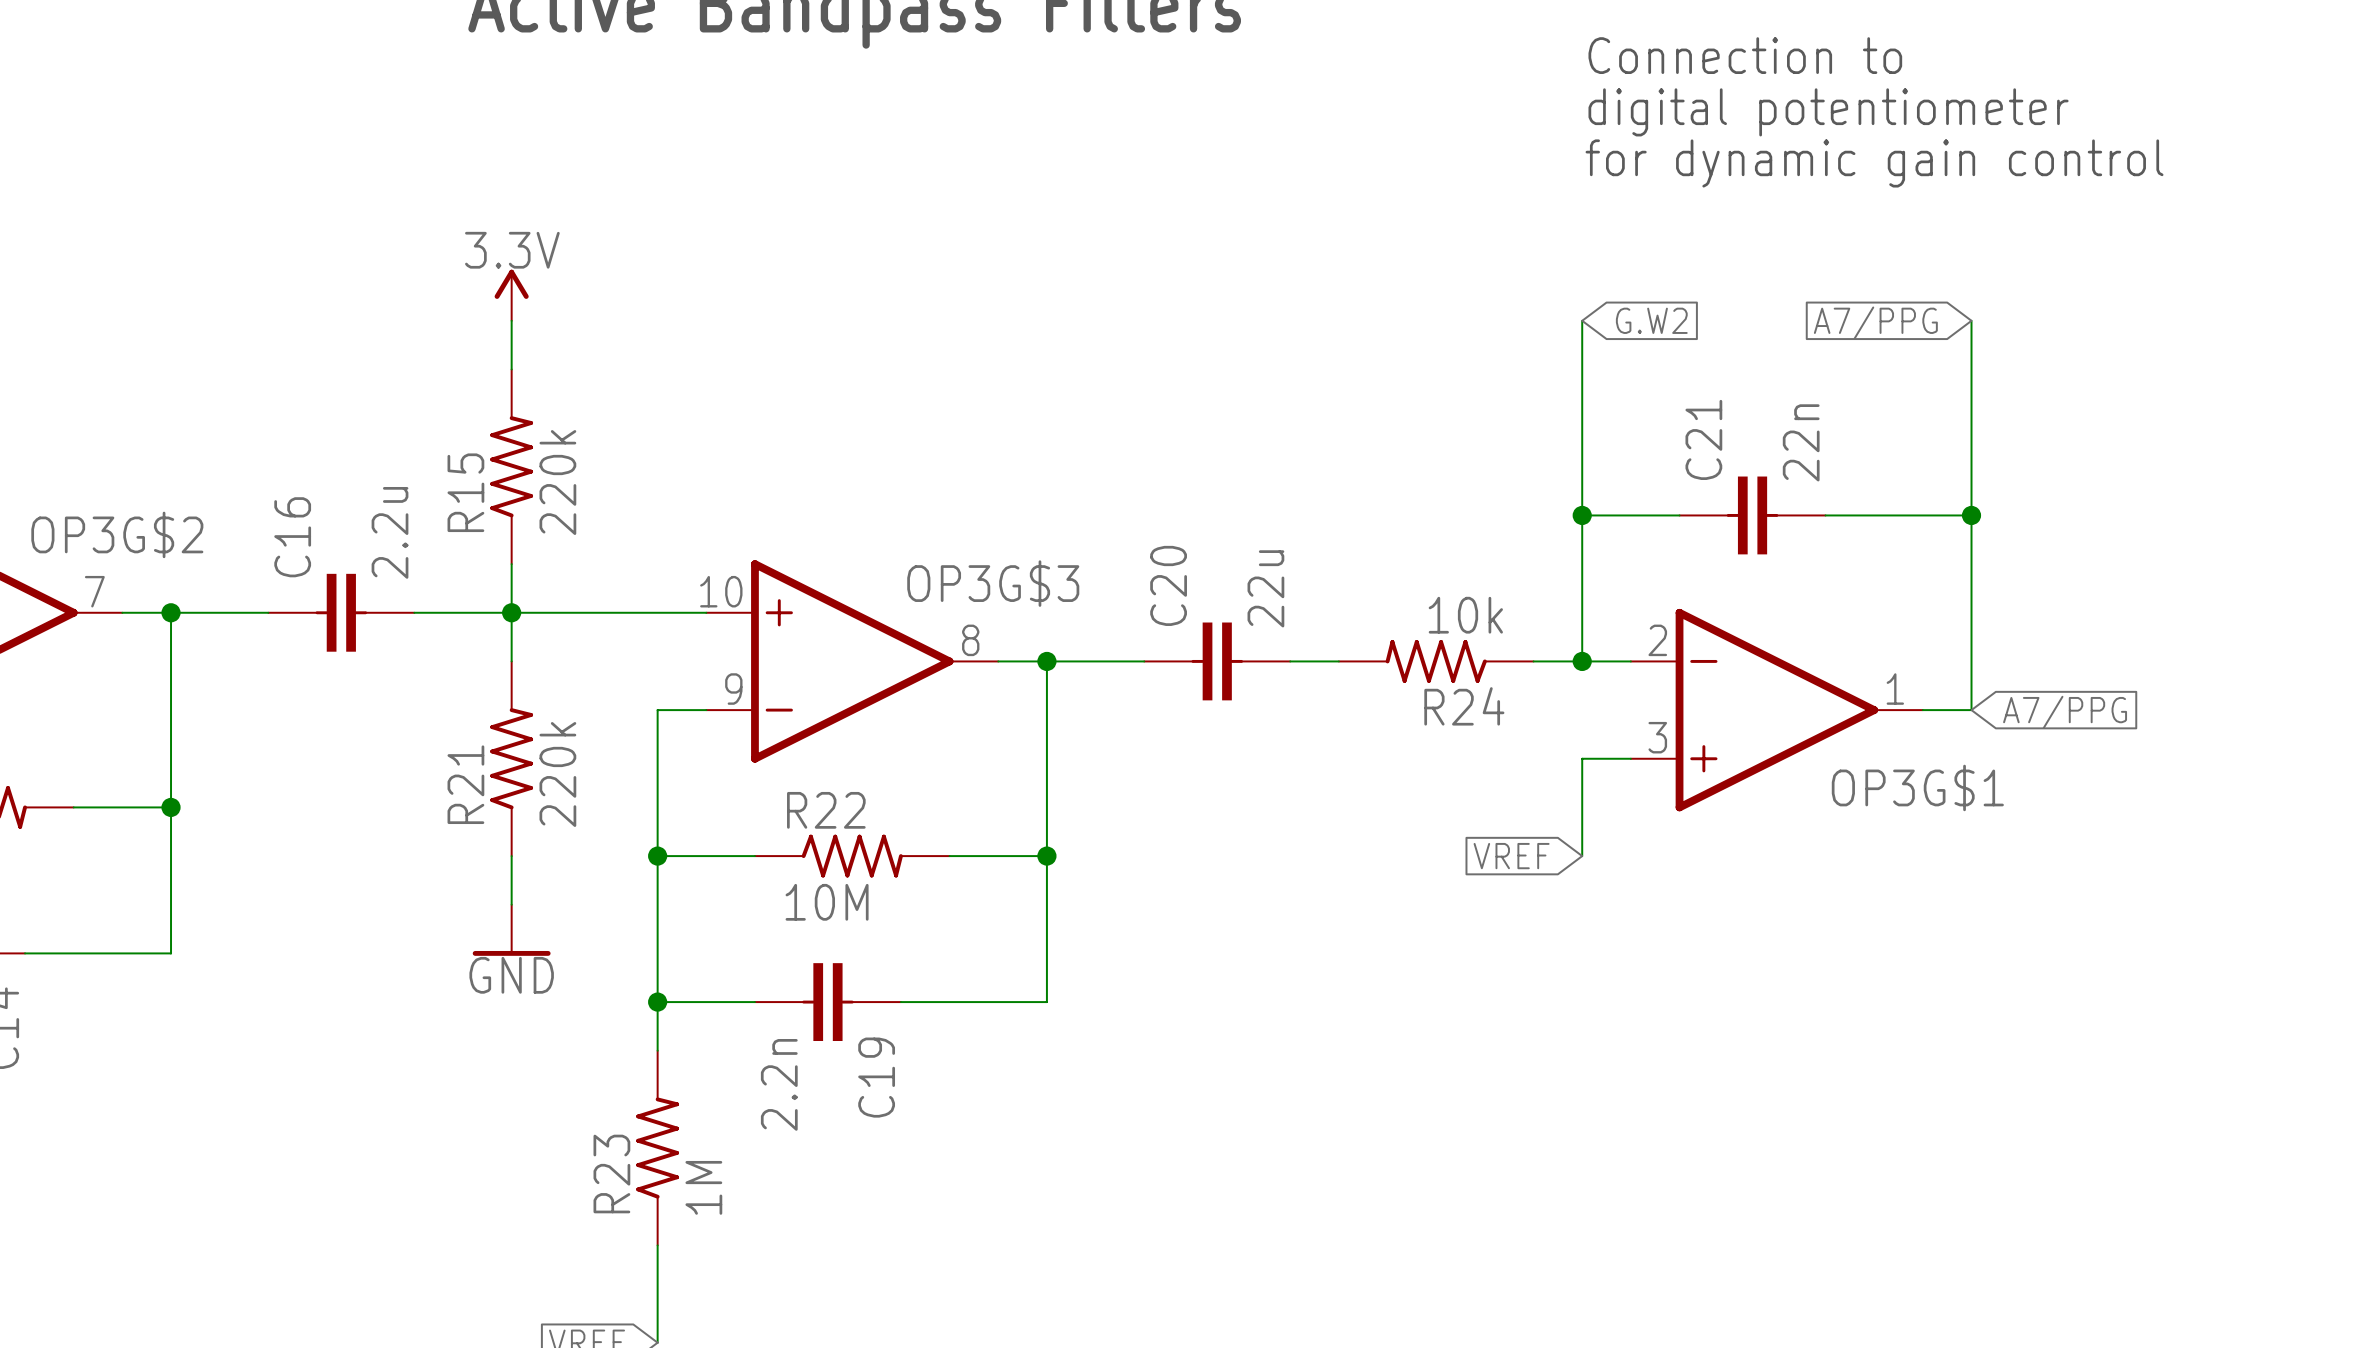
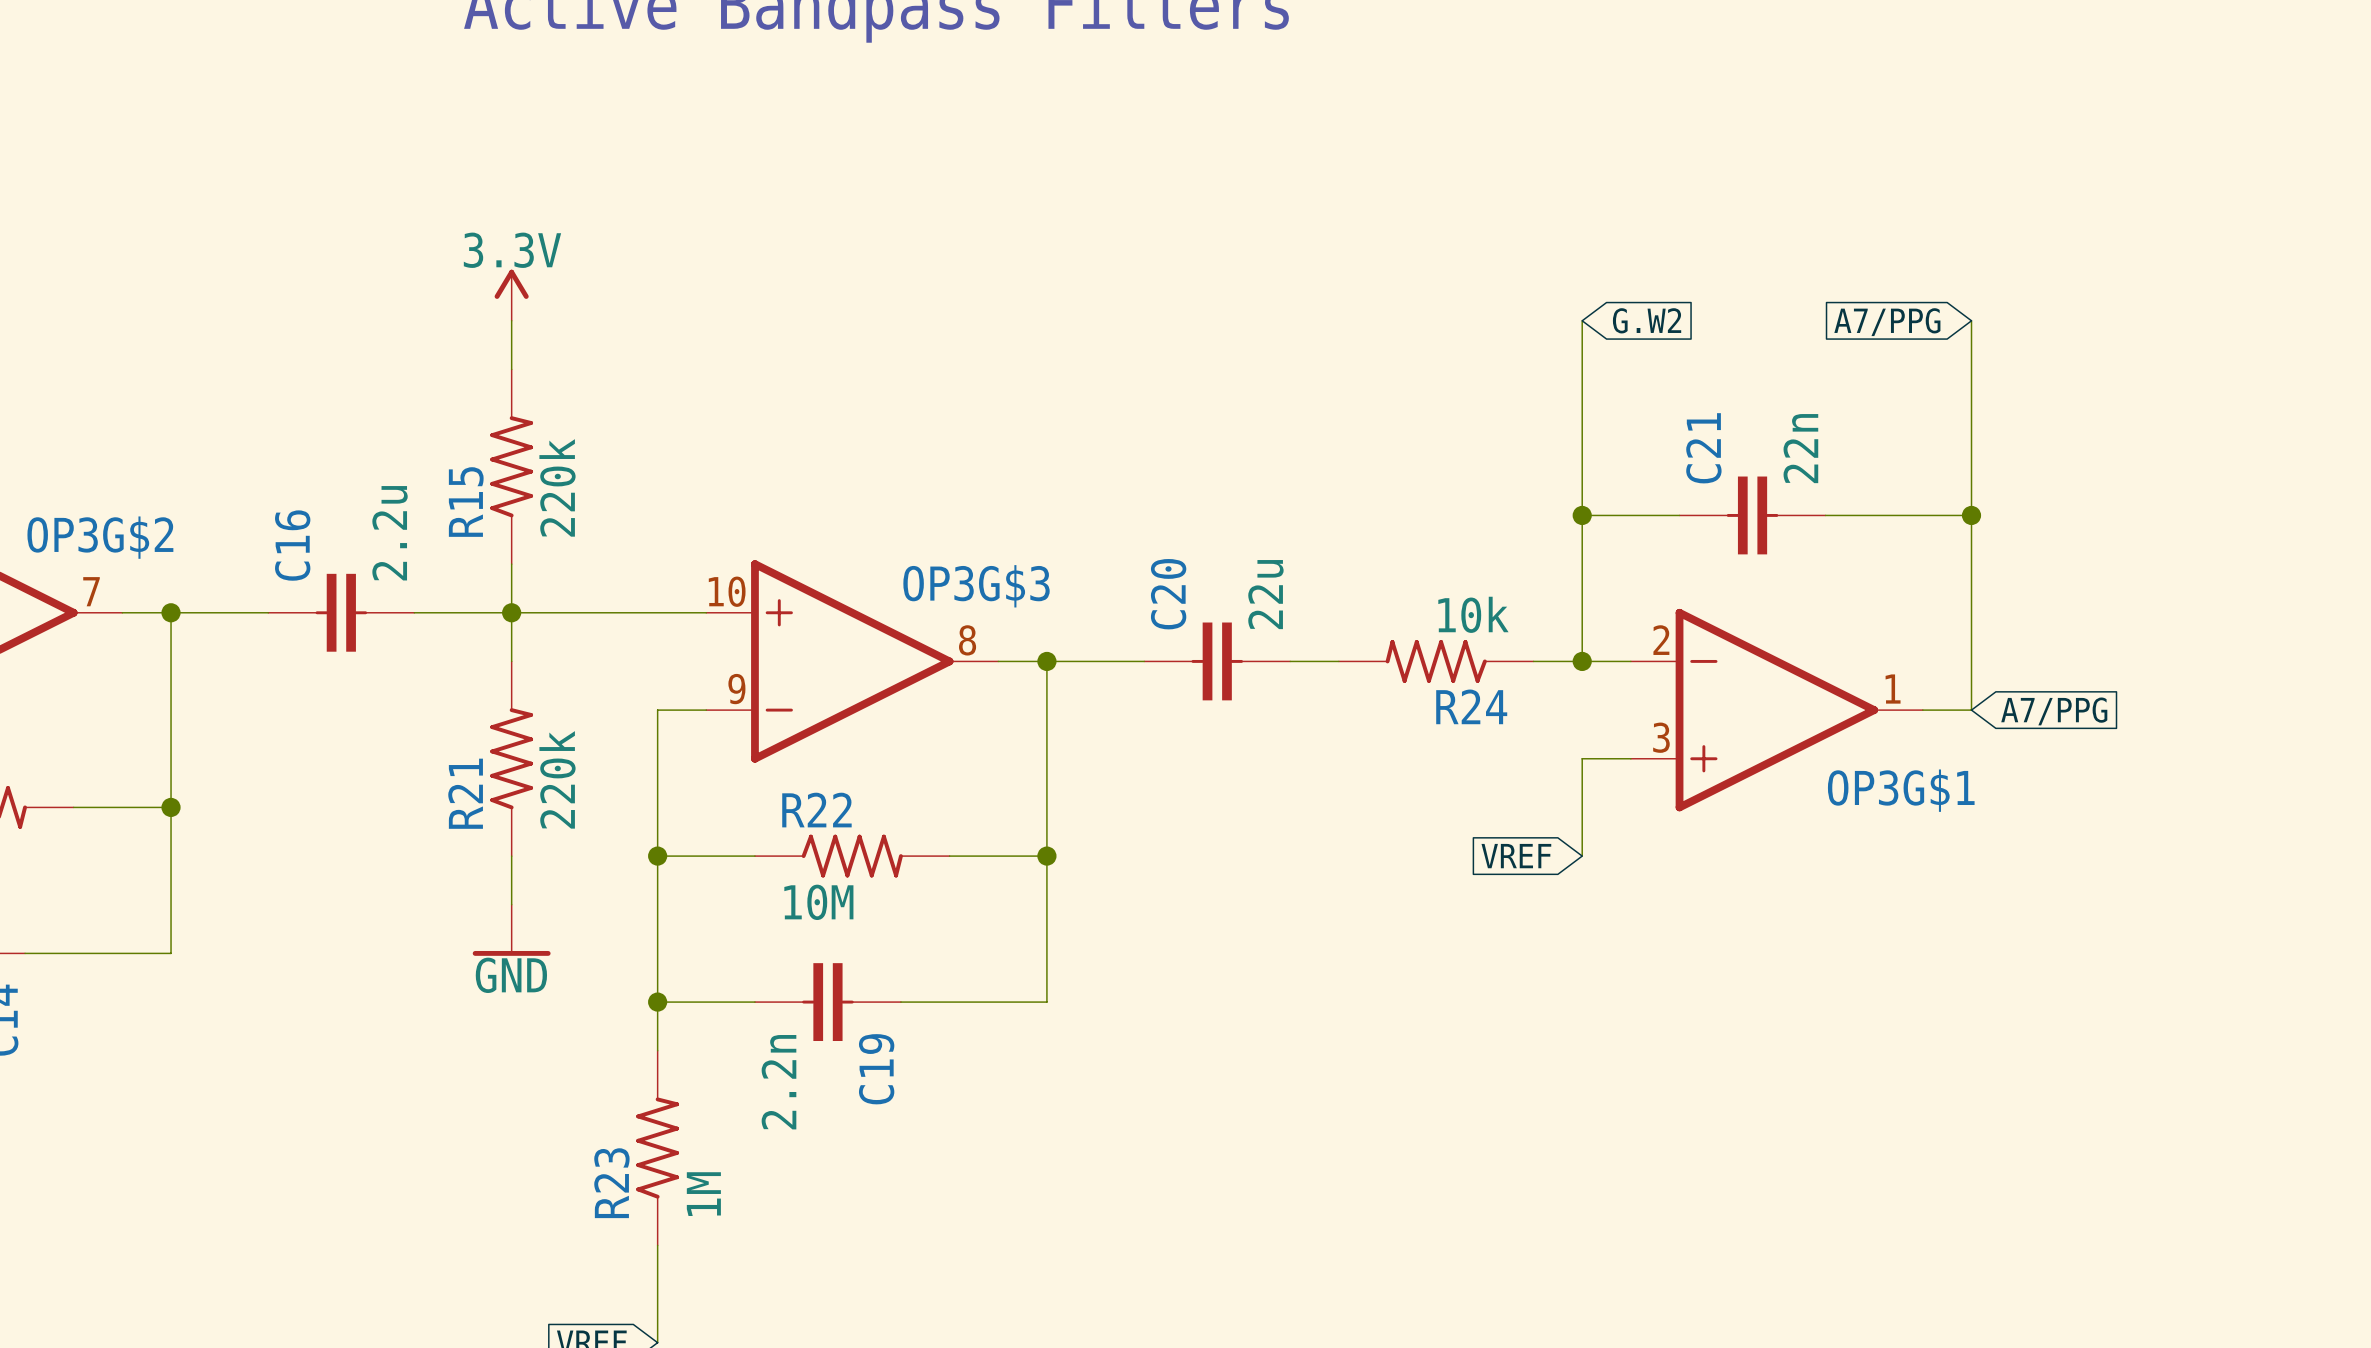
text: Connection to (1745, 55) -> none
text: digital potentiometer (1828, 112) -> none
text: for dynamic gain control (1874, 163) -> none

